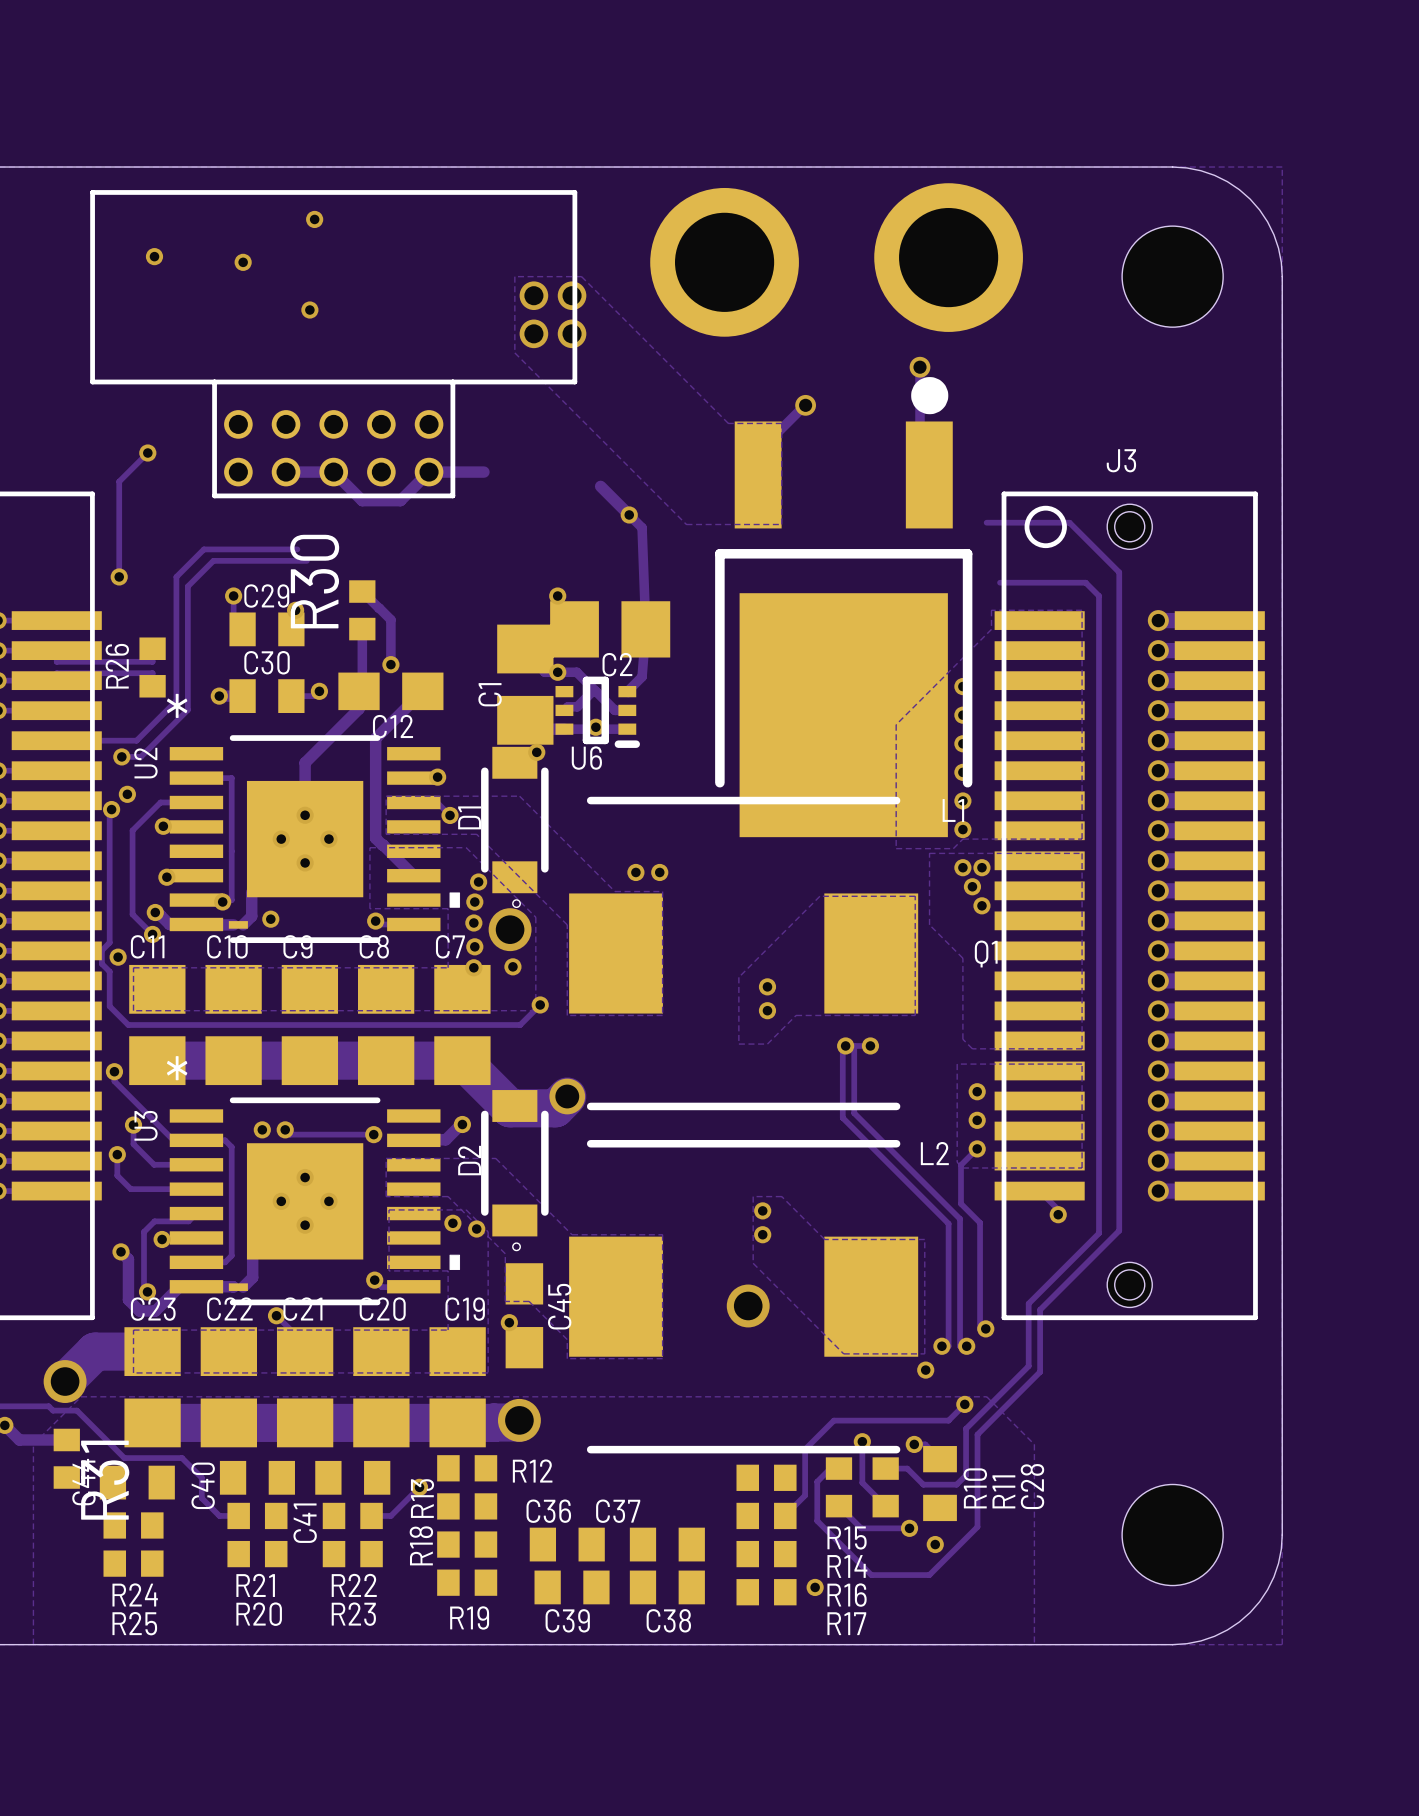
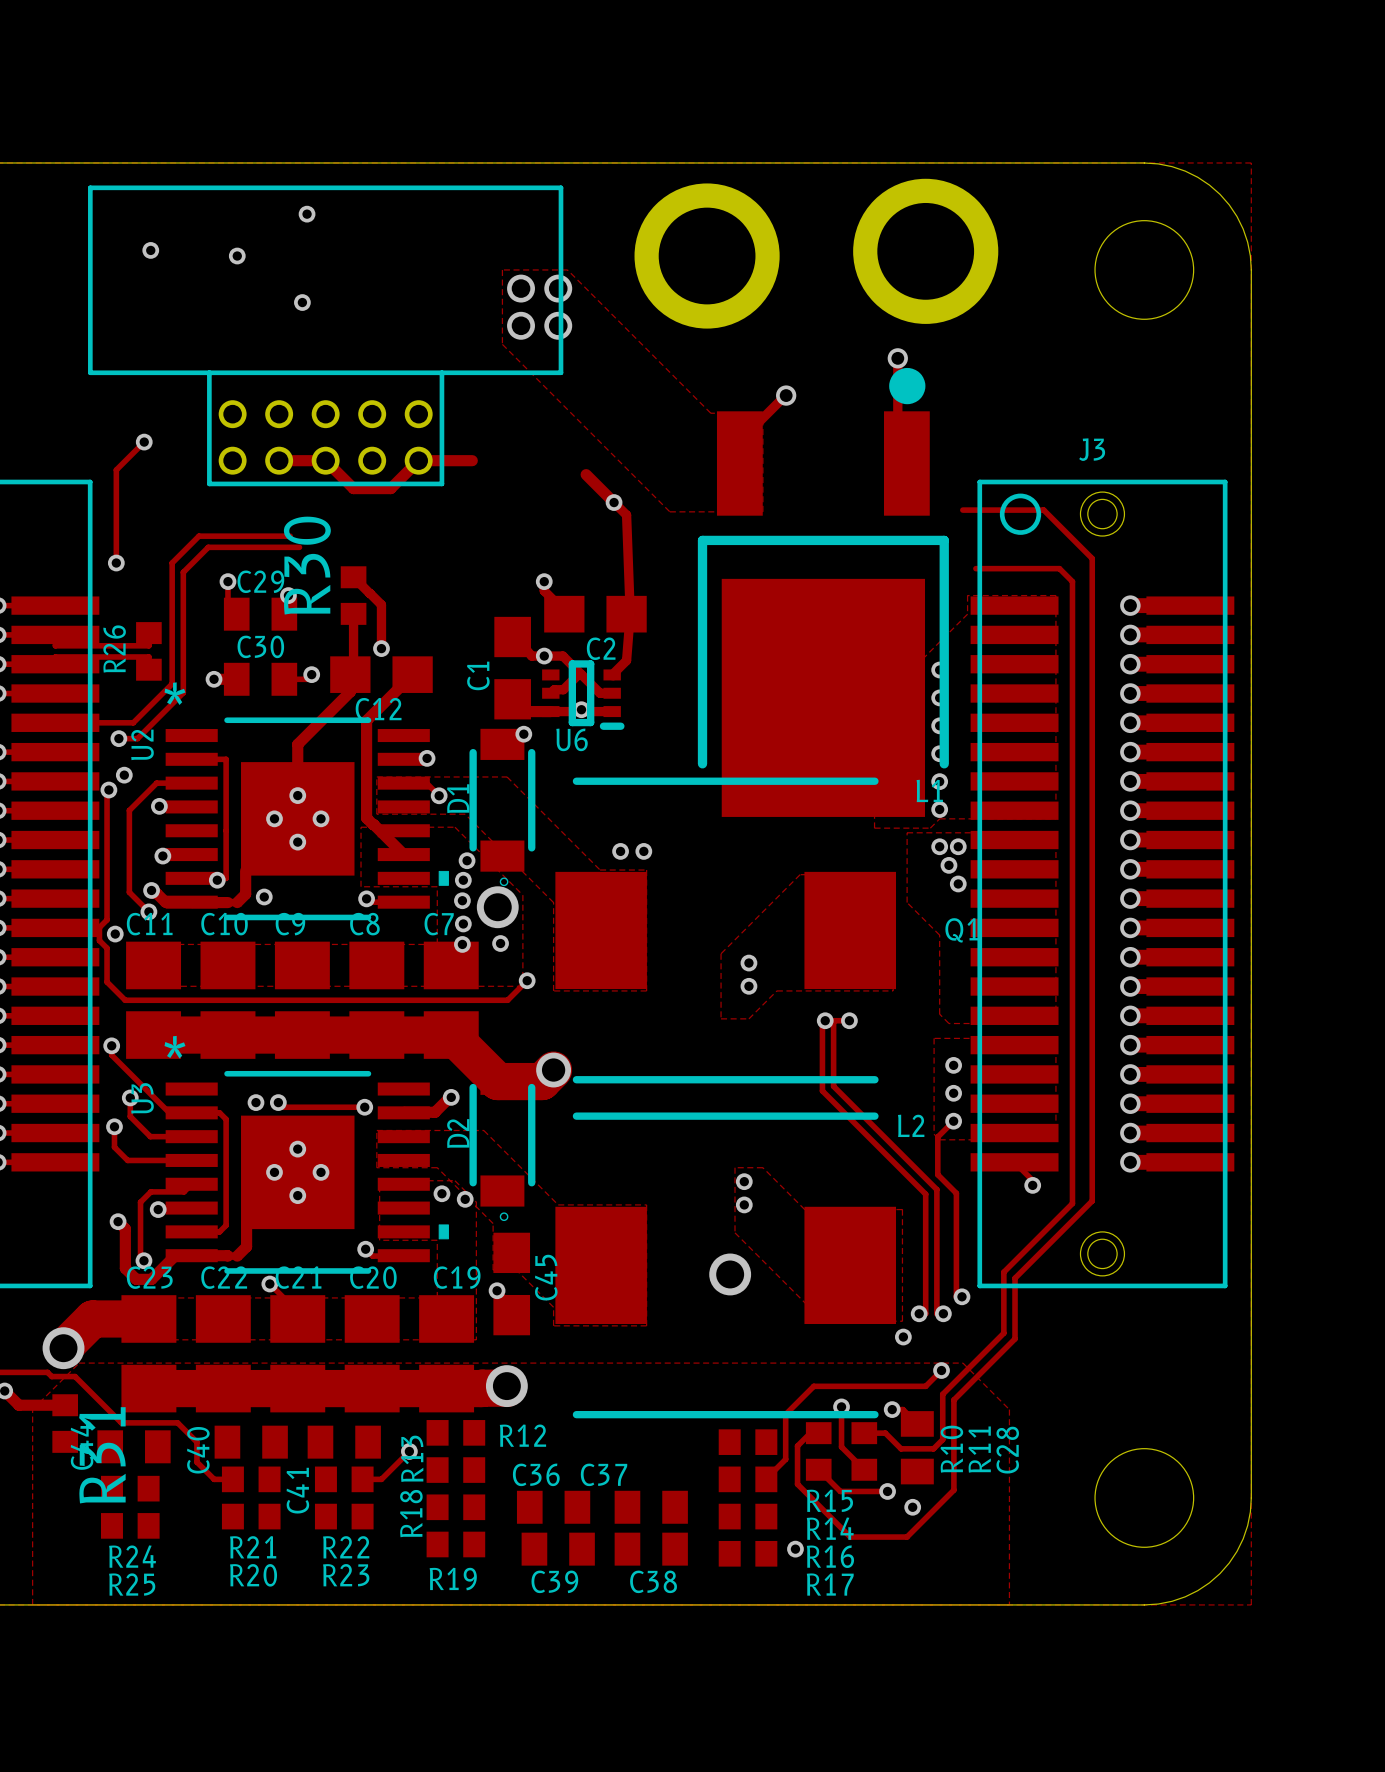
C2 footprint: [550, 601, 671, 658] -> [544, 595, 647, 633]
C1 footprint: [497, 624, 554, 745] -> [494, 616, 531, 720]

